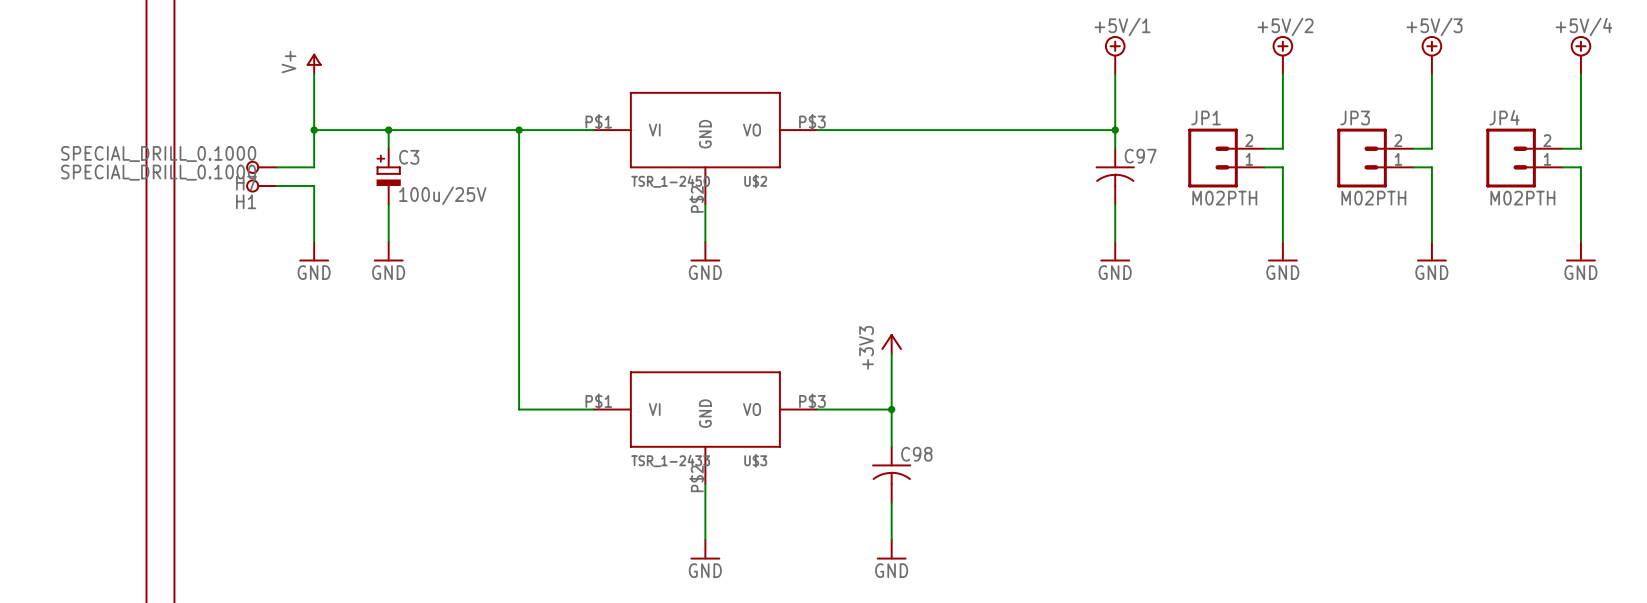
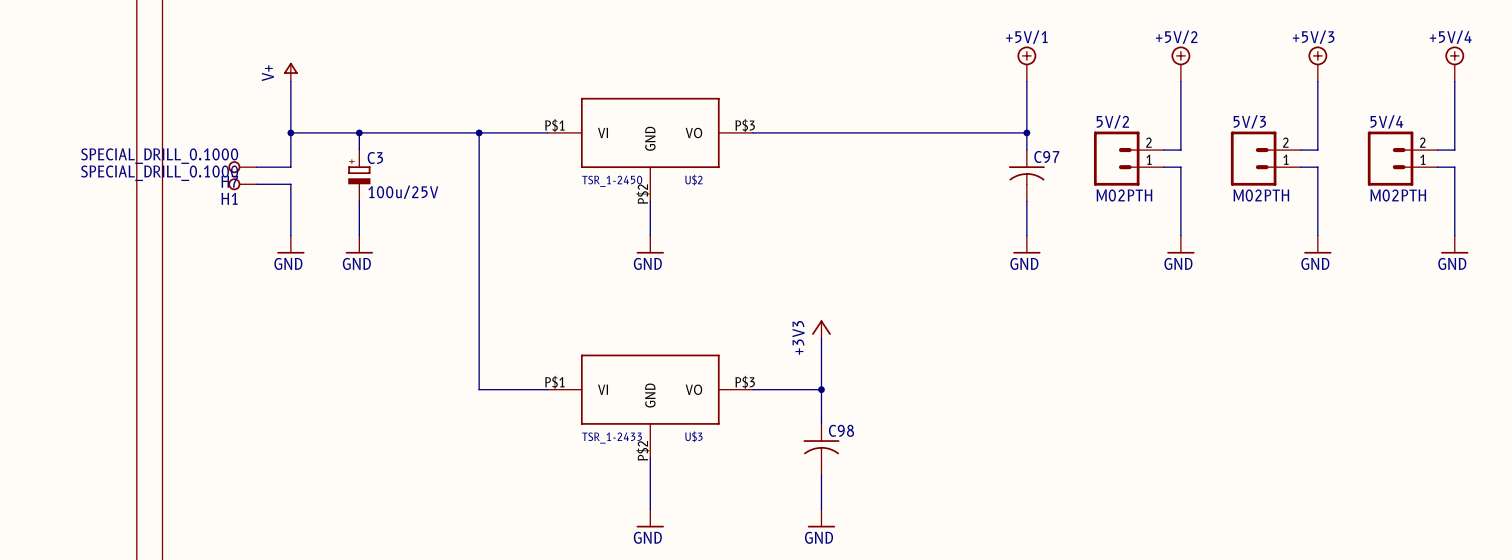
JP1 name: JP1 (1206, 117) -> 5V/2 (1112, 121)
JP3 name: JP3 (1355, 117) -> 5V/3 (1249, 121)
JP4 name: JP4 (1504, 117) -> 5V/4 (1386, 121)

